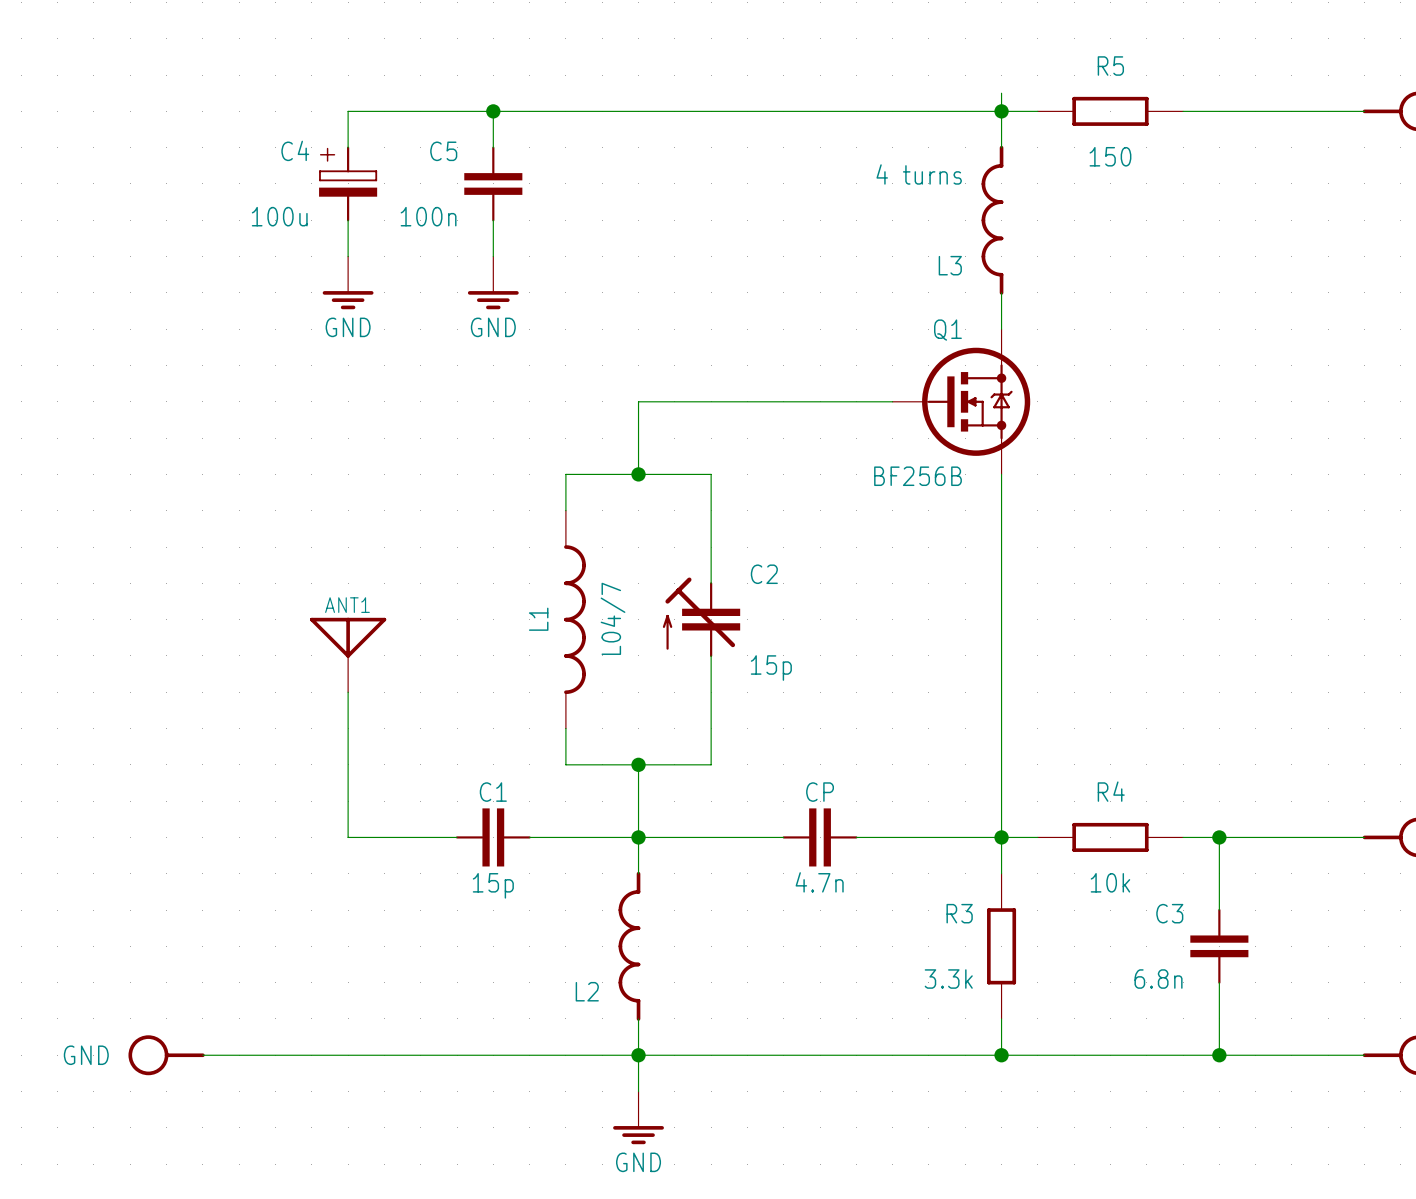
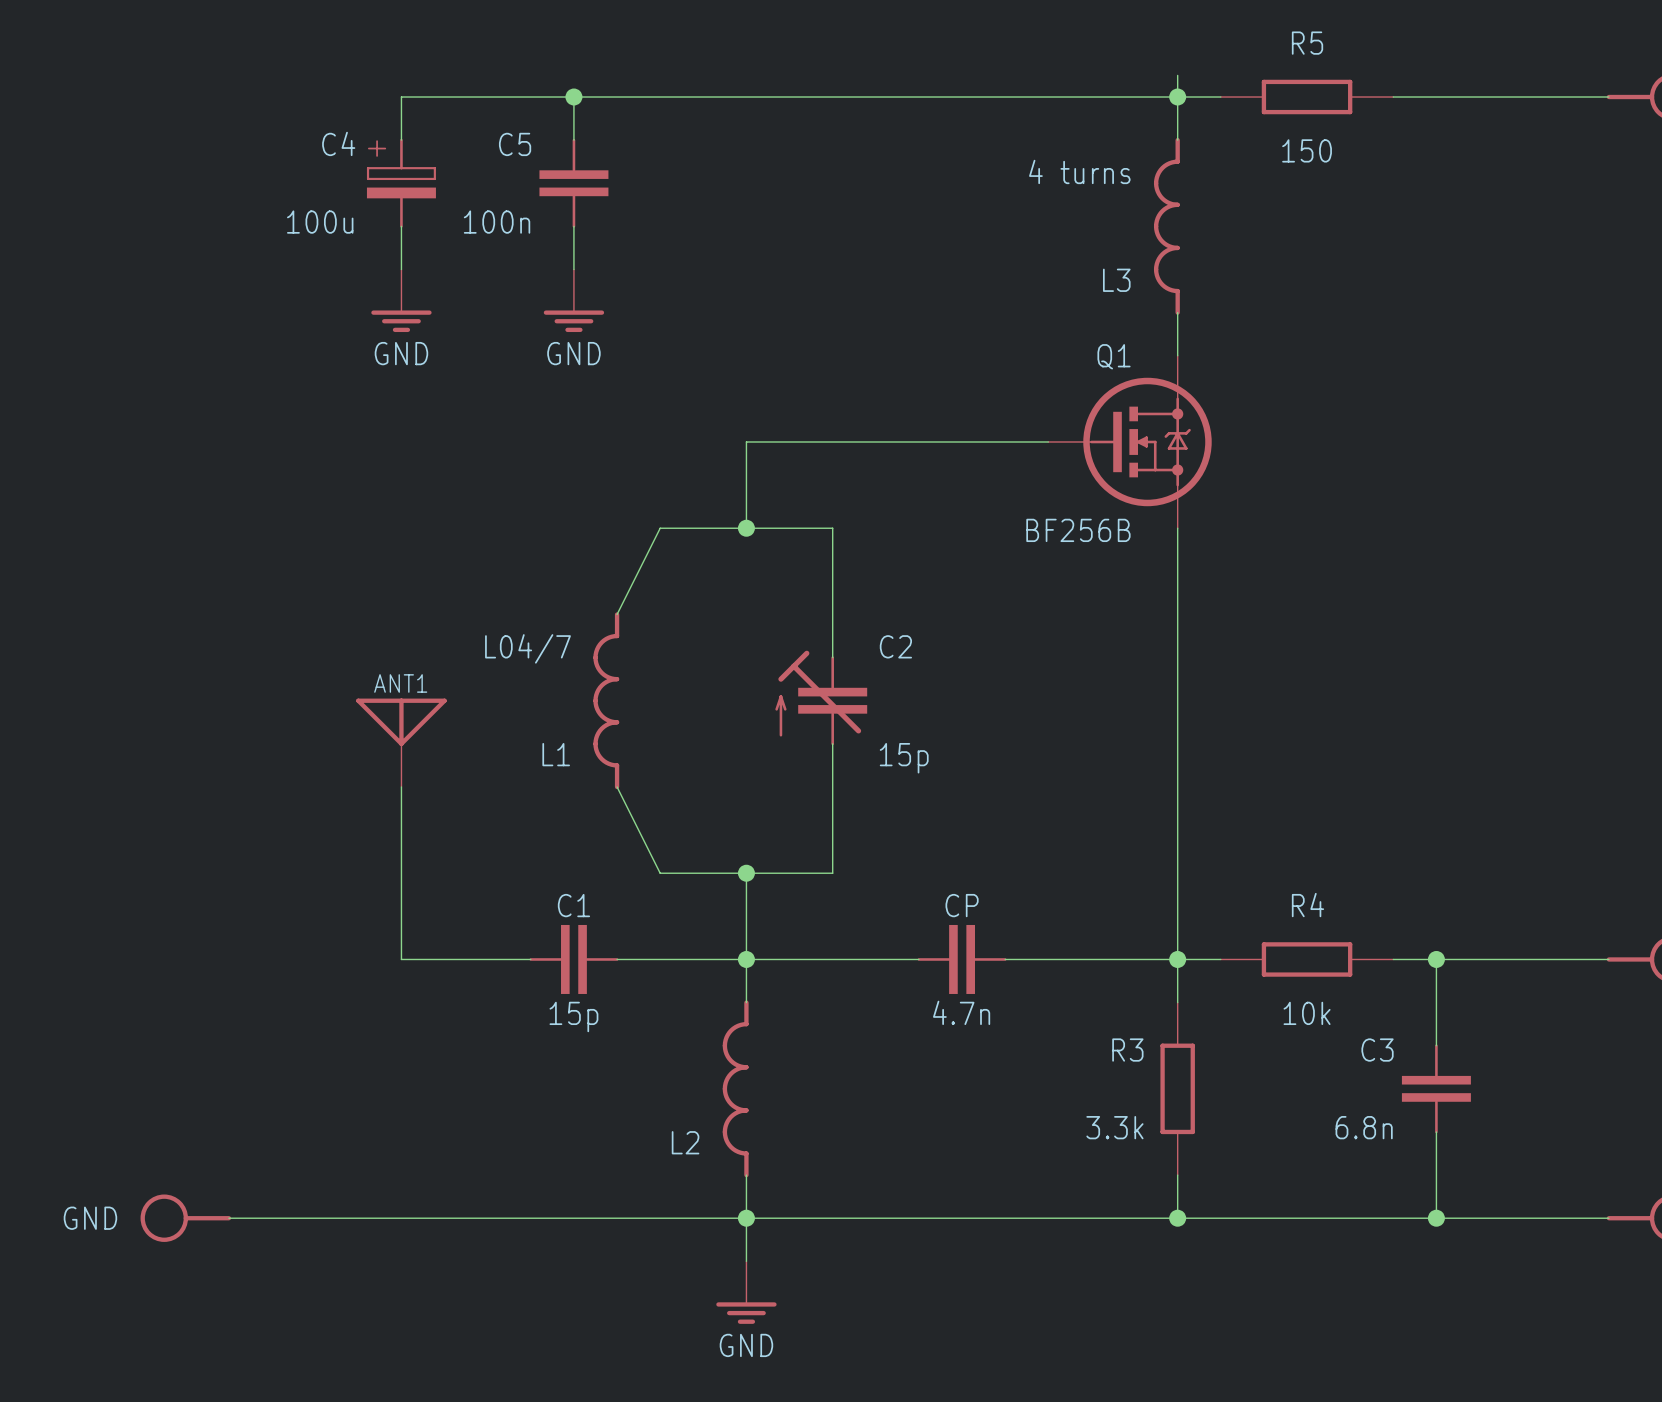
wire: (565, 474) (565, 510) -> (660, 528) (617, 614)
L1 symbol: [564, 510, 586, 729] -> [593, 612, 620, 790]
L1 value position: L04/7 (613, 618) -> L04/7 (527, 648)
L1 name position: L1 (538, 619) -> L1 (556, 754)
wire: (565, 728) (565, 764) -> (617, 786) (660, 873)

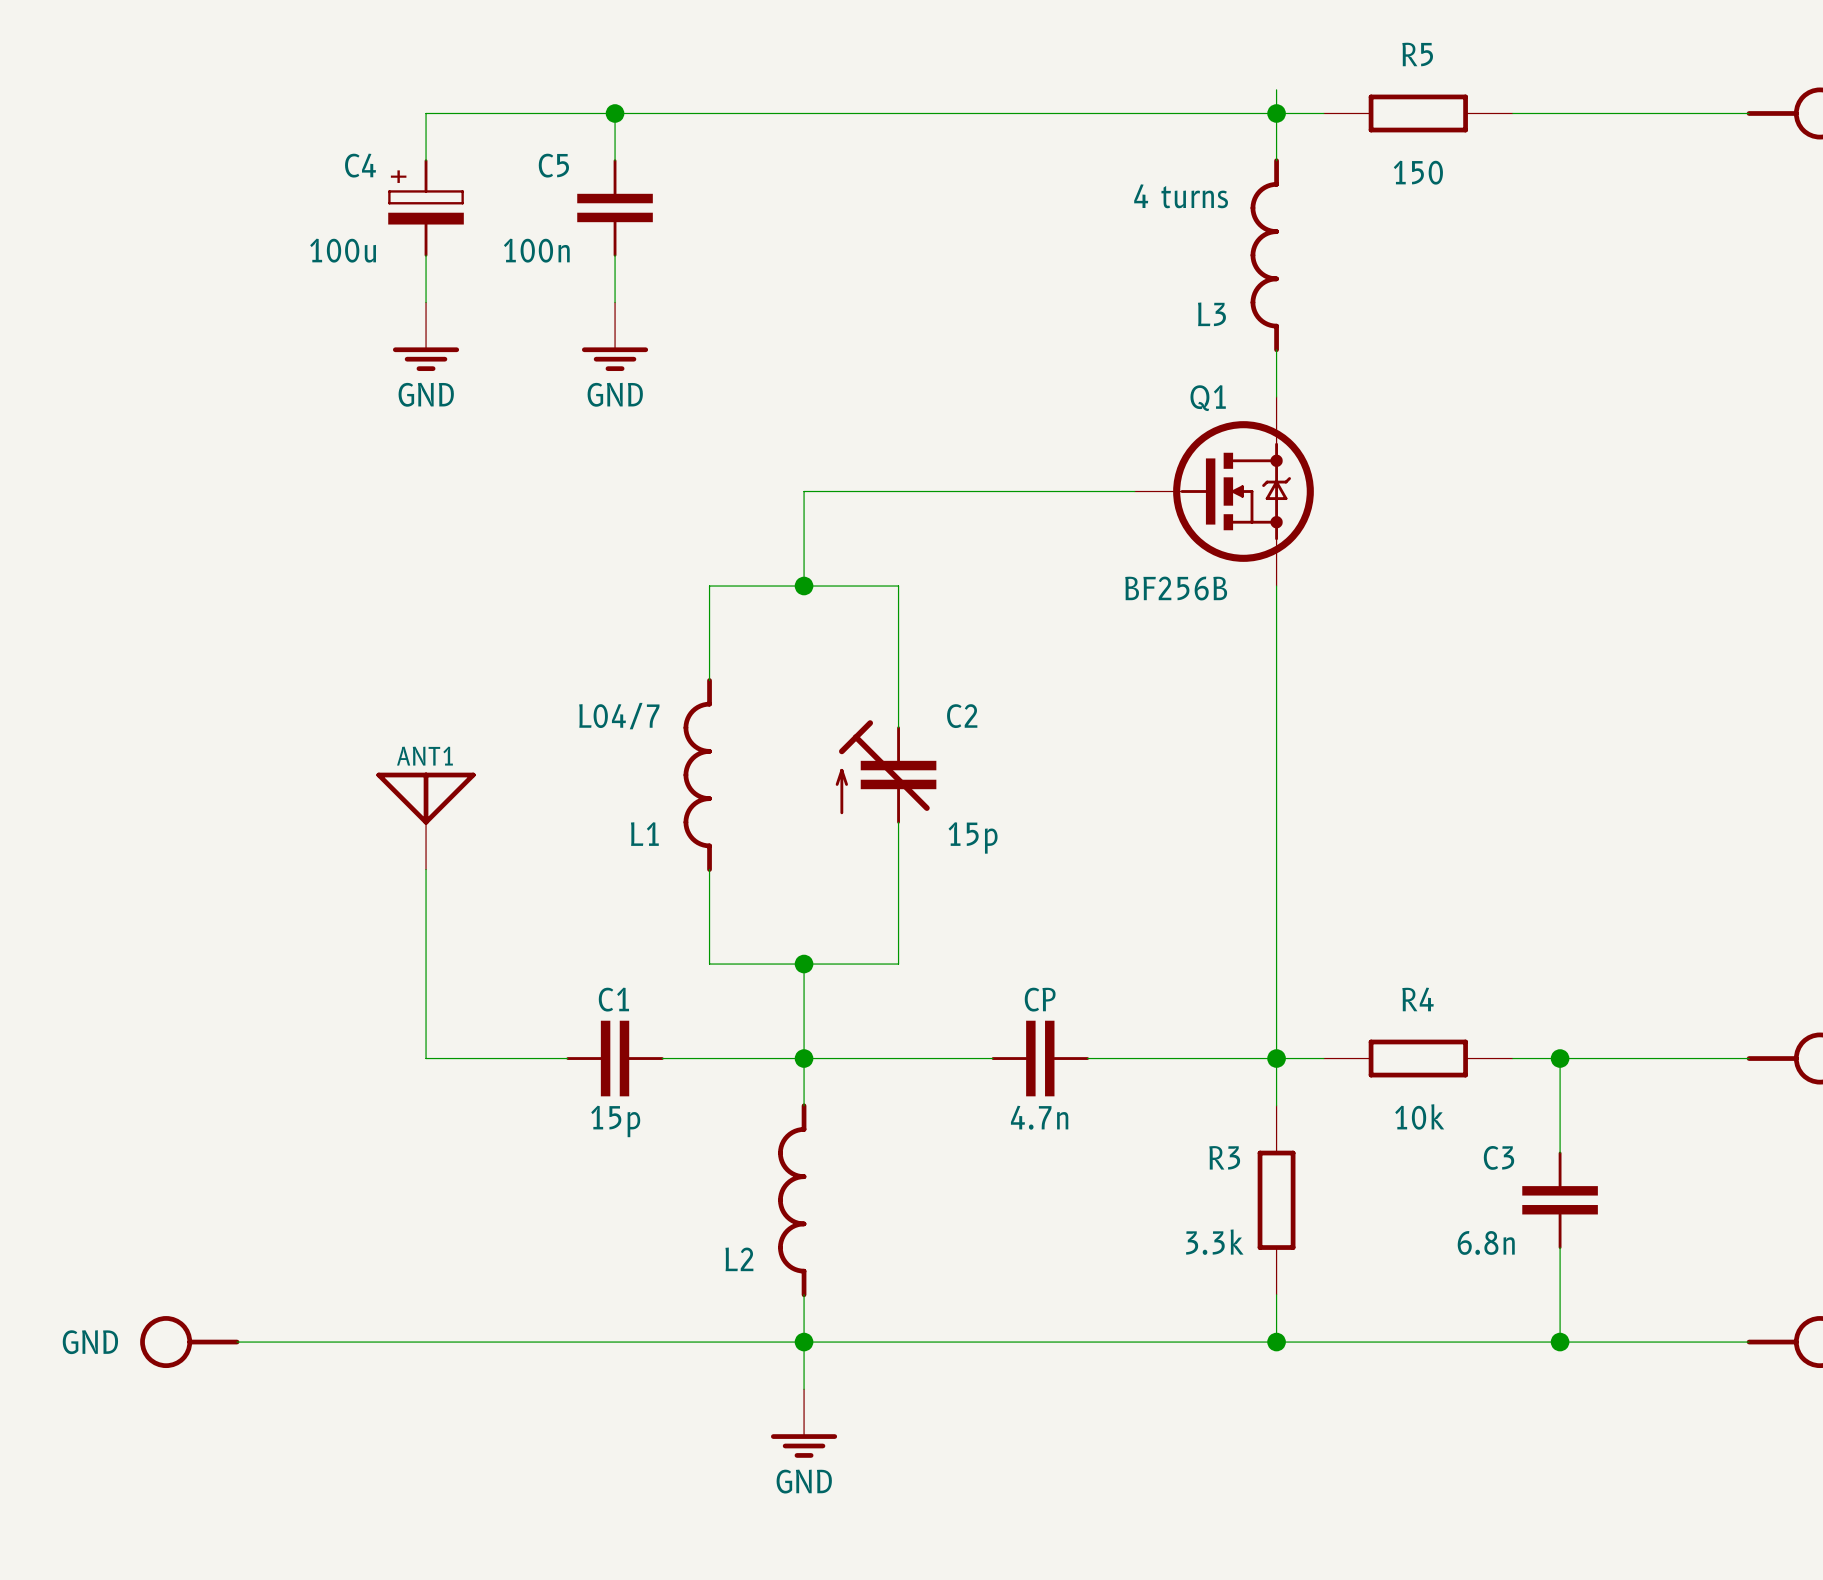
wire: (660, 528) (617, 614) -> (709, 586) (709, 680)
L1 position: (606, 700) -> (697, 775)
wire: (617, 786) (660, 873) -> (709, 869) (709, 964)

